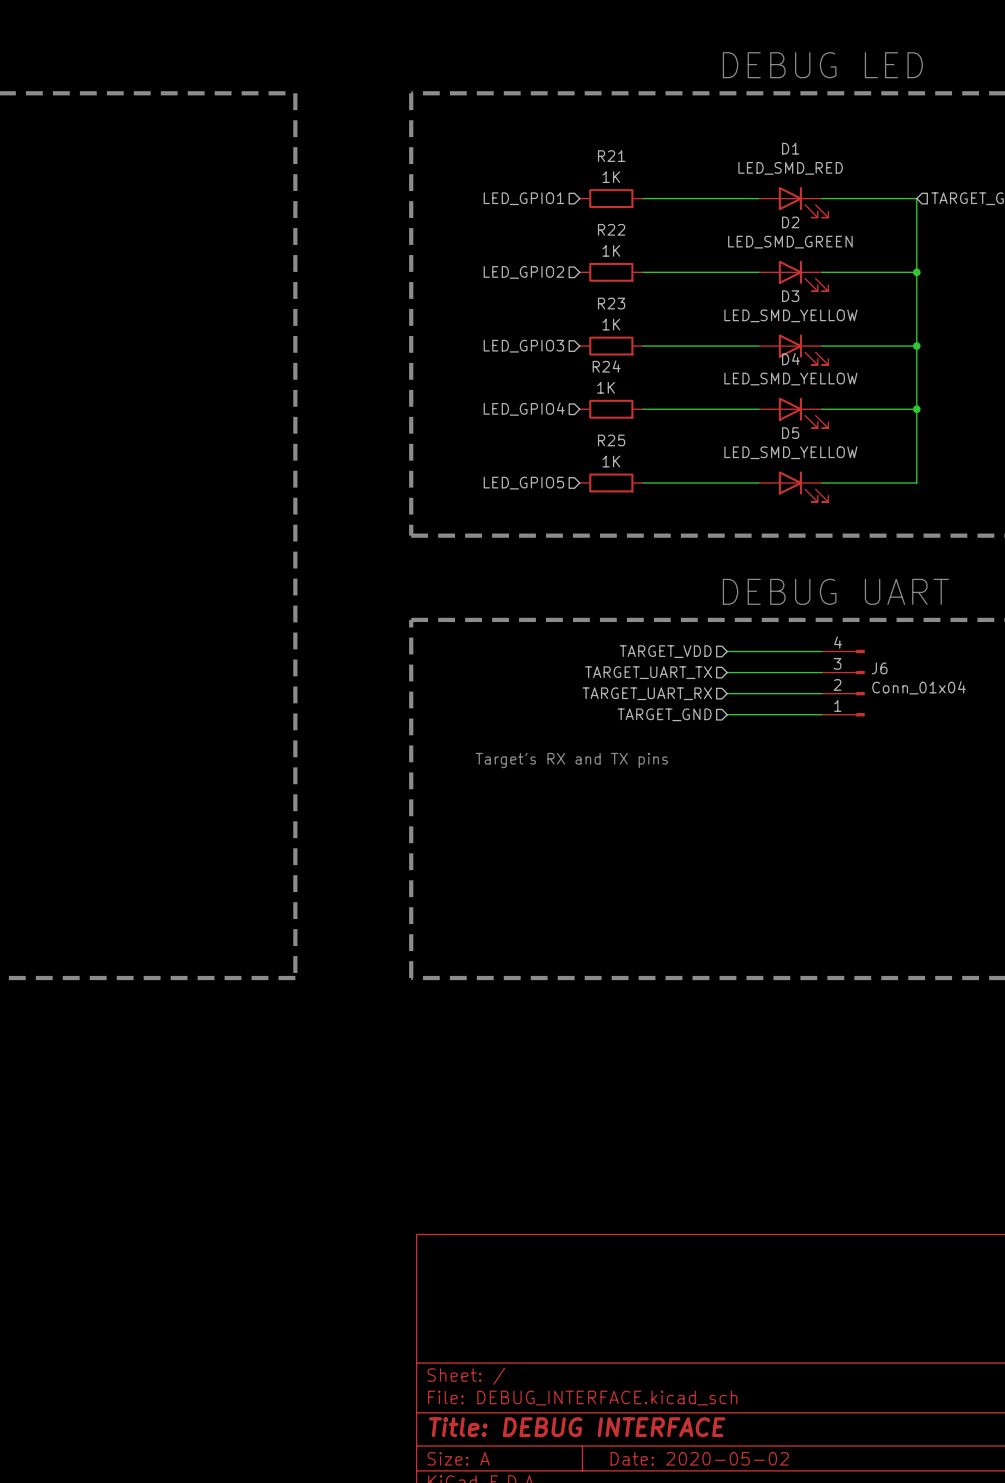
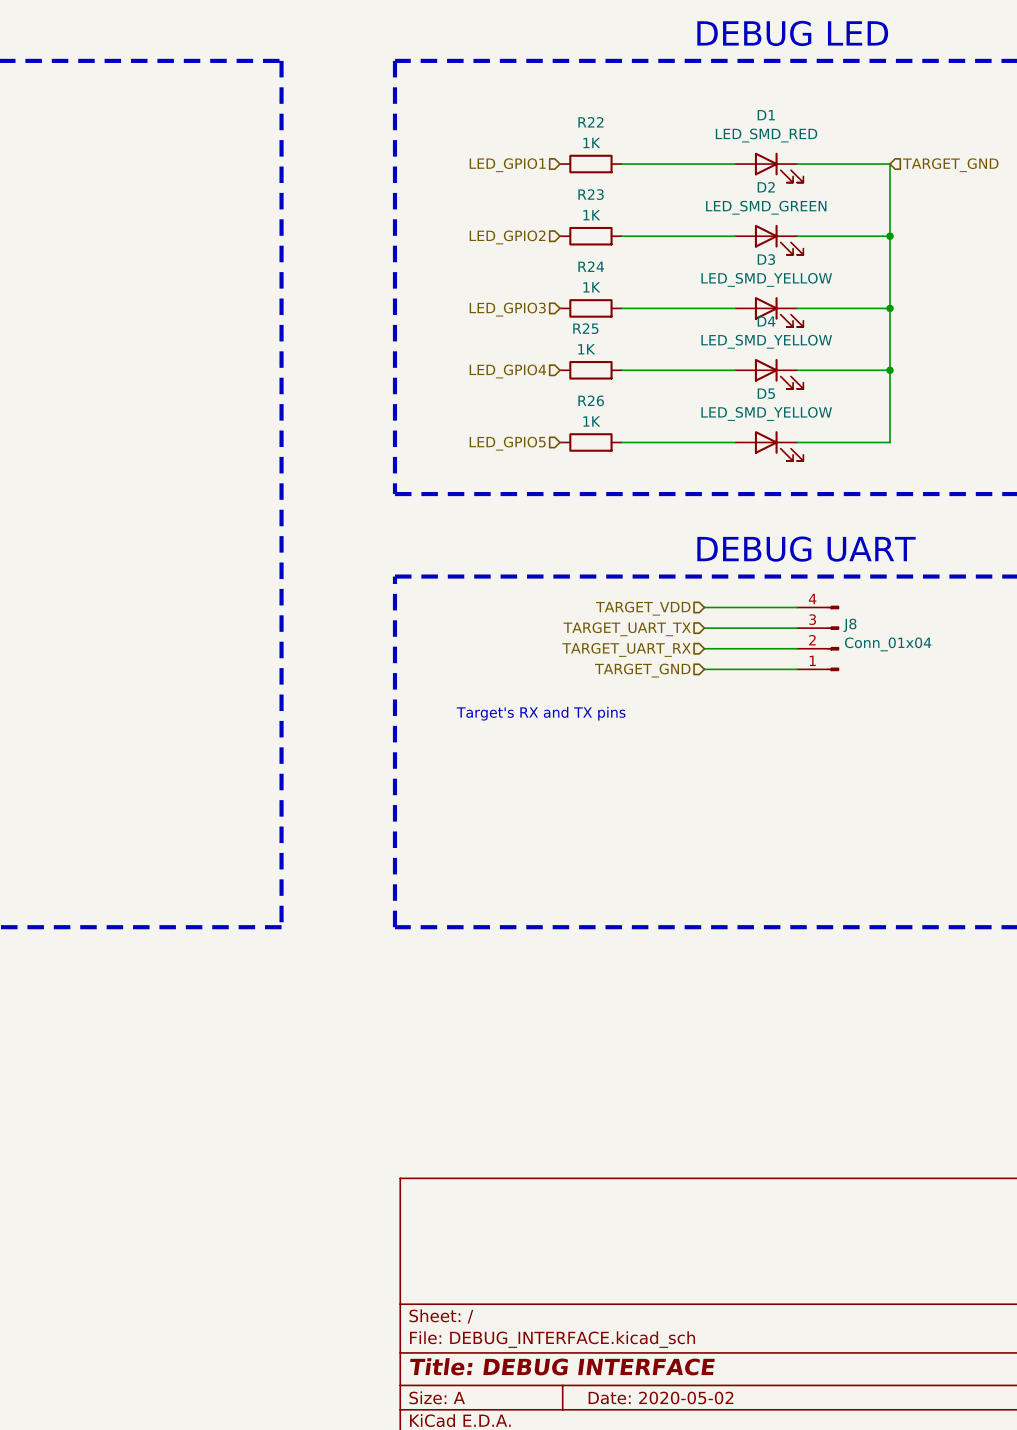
R21 name: R21 (611, 156) -> R22 (590, 122)
R22 name: R22 (611, 229) -> R23 (591, 194)
R23 name: R23 (611, 303) -> R24 (591, 266)
R24 name: R24 (606, 366) -> R25 (585, 328)
R25 name: R25 (611, 440) -> R26 (591, 400)
J6 name: J6 (879, 668) -> J8 (849, 625)

